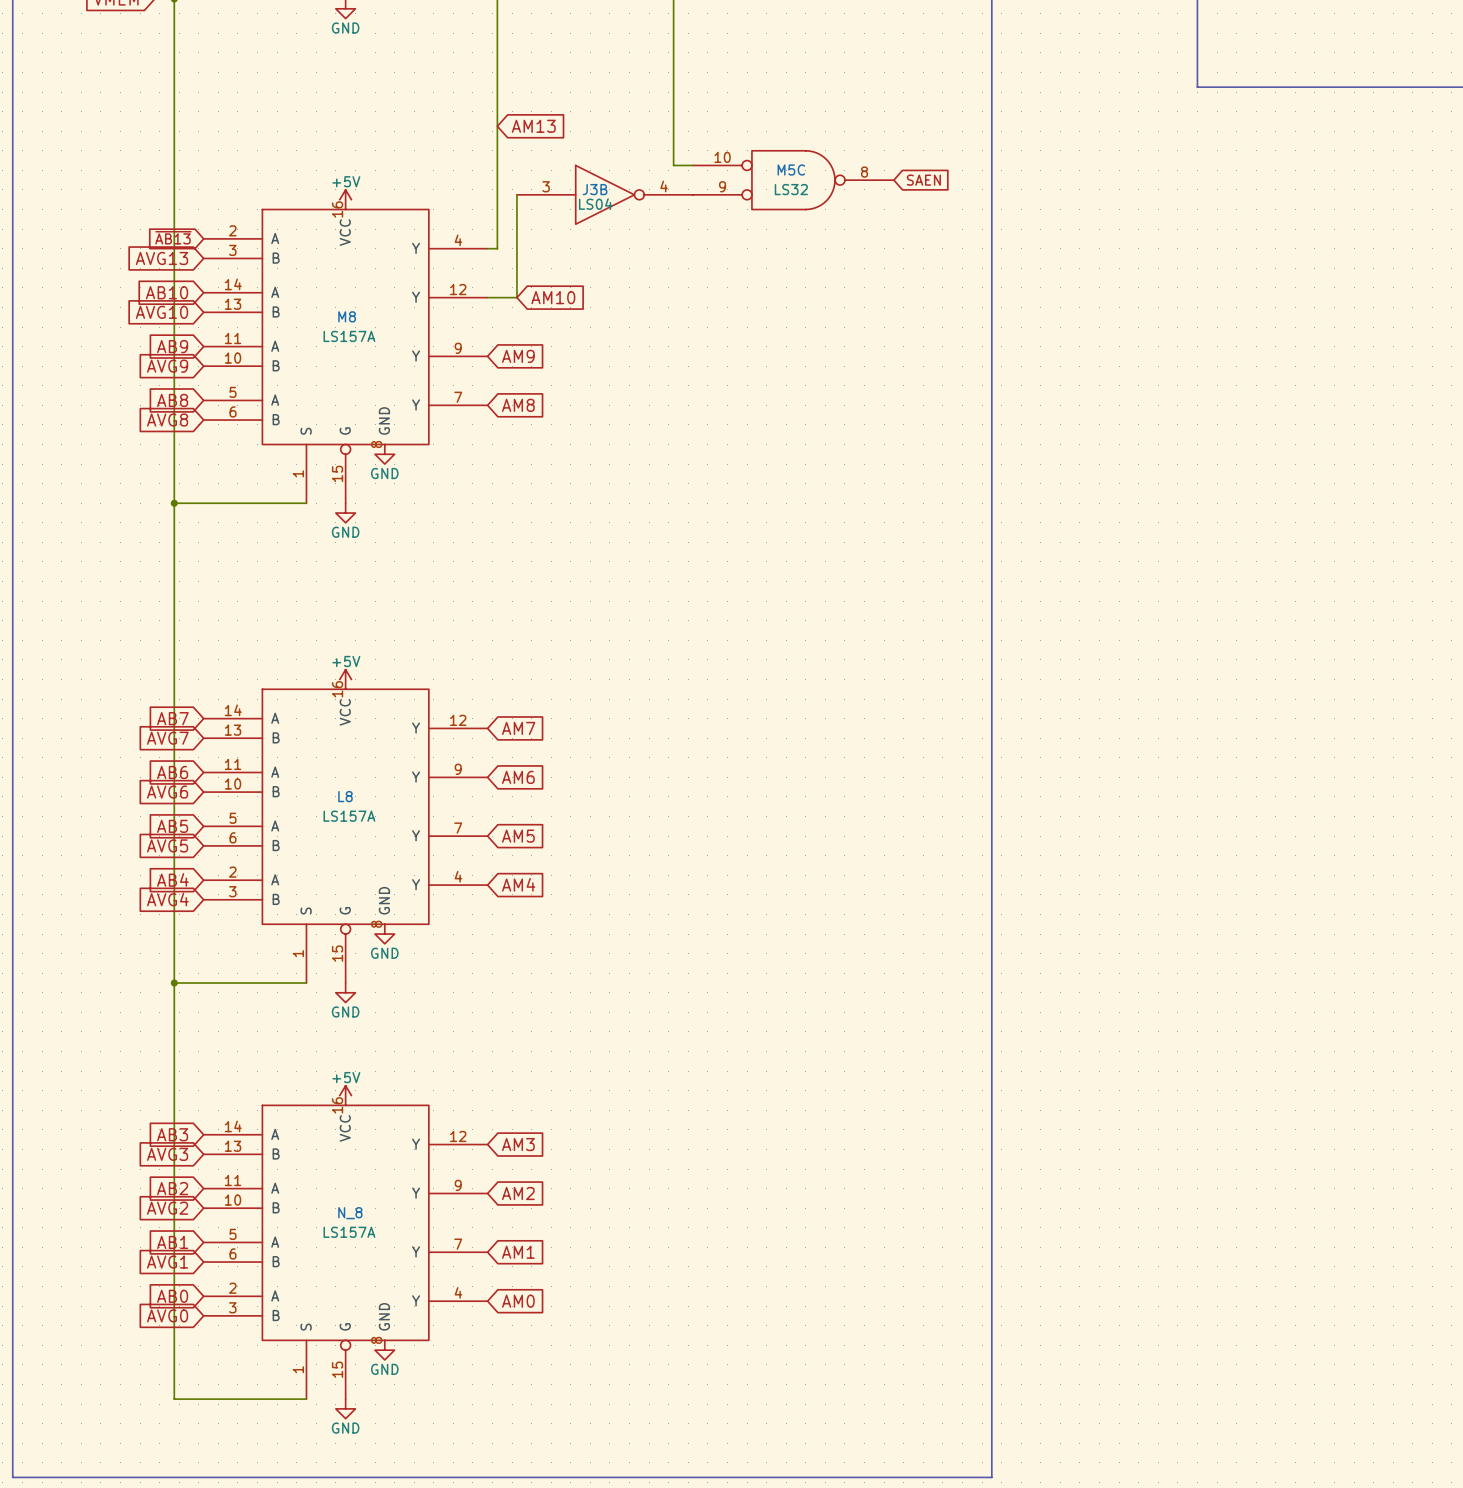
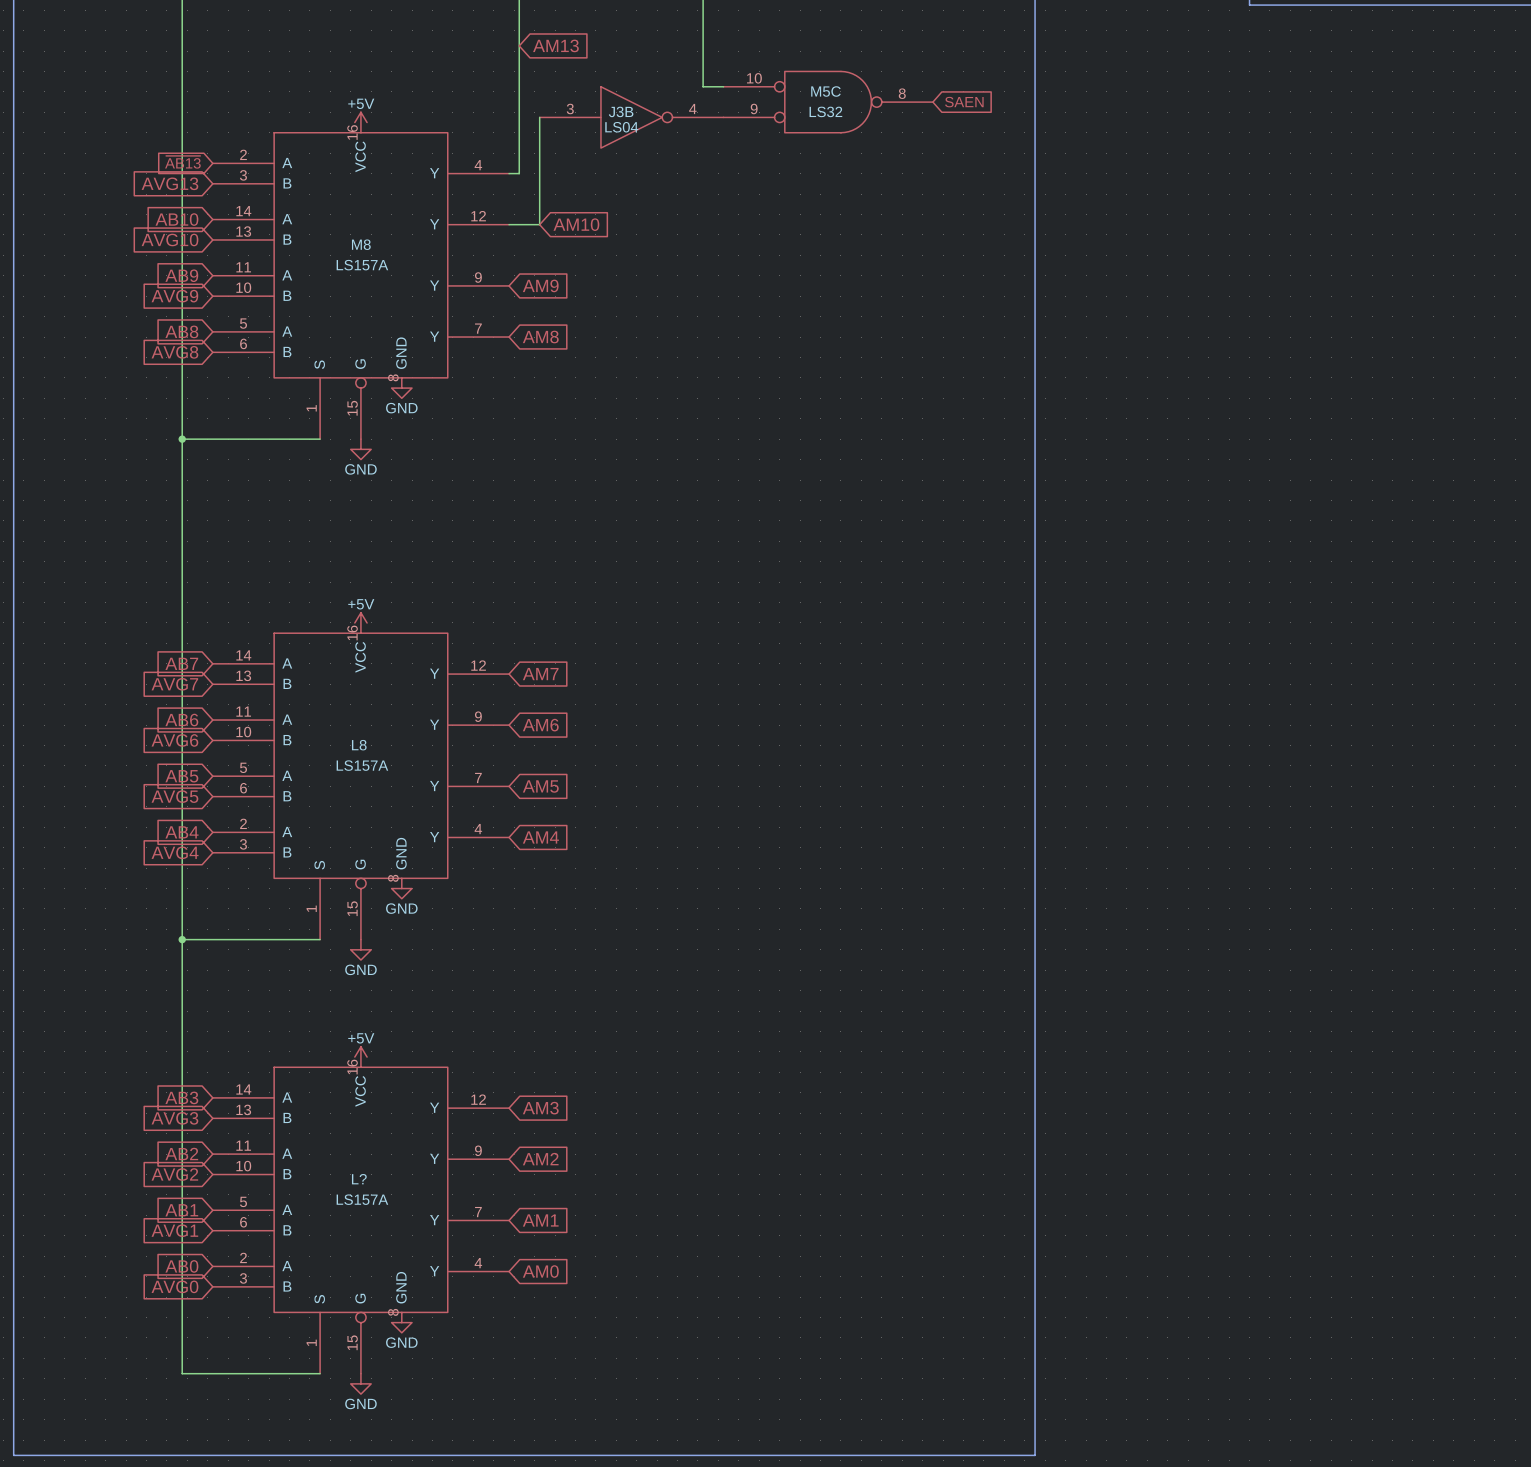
N_8 name: N_8 (350, 1213) -> L? (359, 1179)

